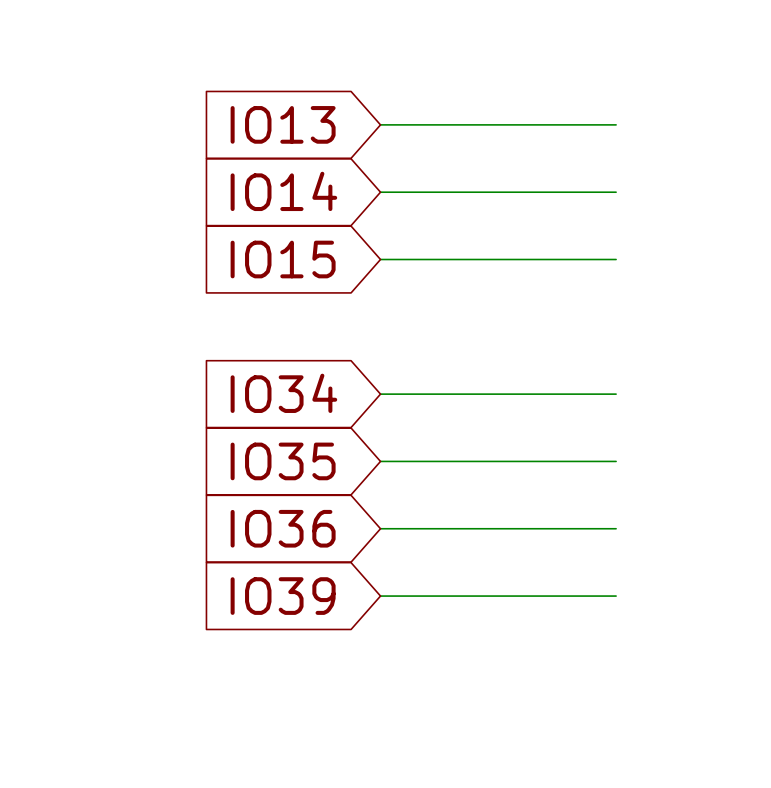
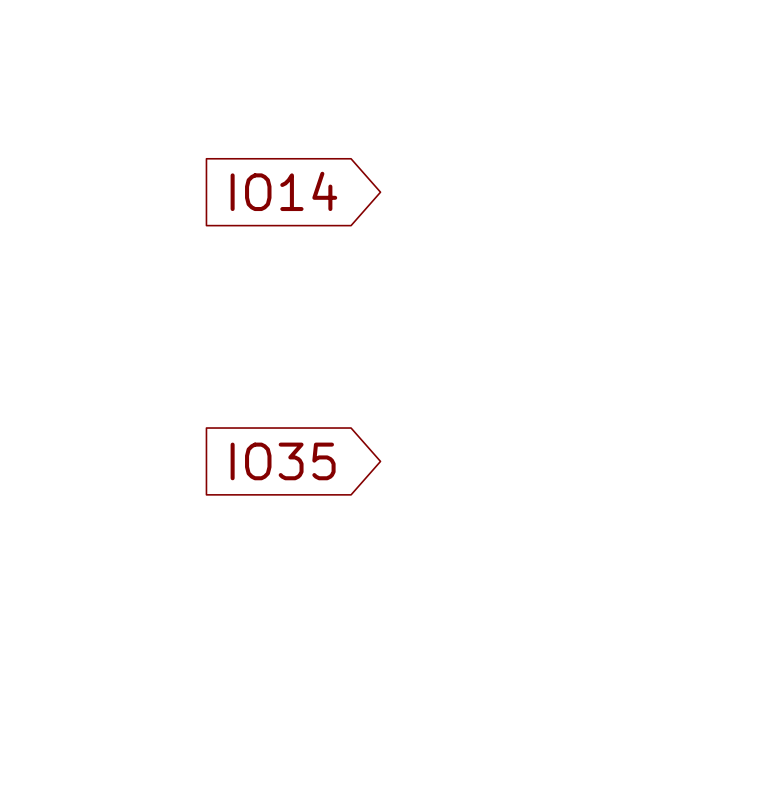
global label: IO13 (283, 124) -> none
wire: (380, 124) (616, 124) -> none
wire: (380, 192) (616, 192) -> none
global label: IO15 (283, 259) -> none
wire: (380, 259) (616, 259) -> none
global label: IO34 (283, 393) -> none
wire: (380, 394) (616, 394) -> none
wire: (380, 461) (616, 461) -> none
global label: IO36 (283, 528) -> none
wire: (380, 528) (616, 528) -> none
global label: IO39 (283, 596) -> none
wire: (380, 596) (616, 596) -> none

